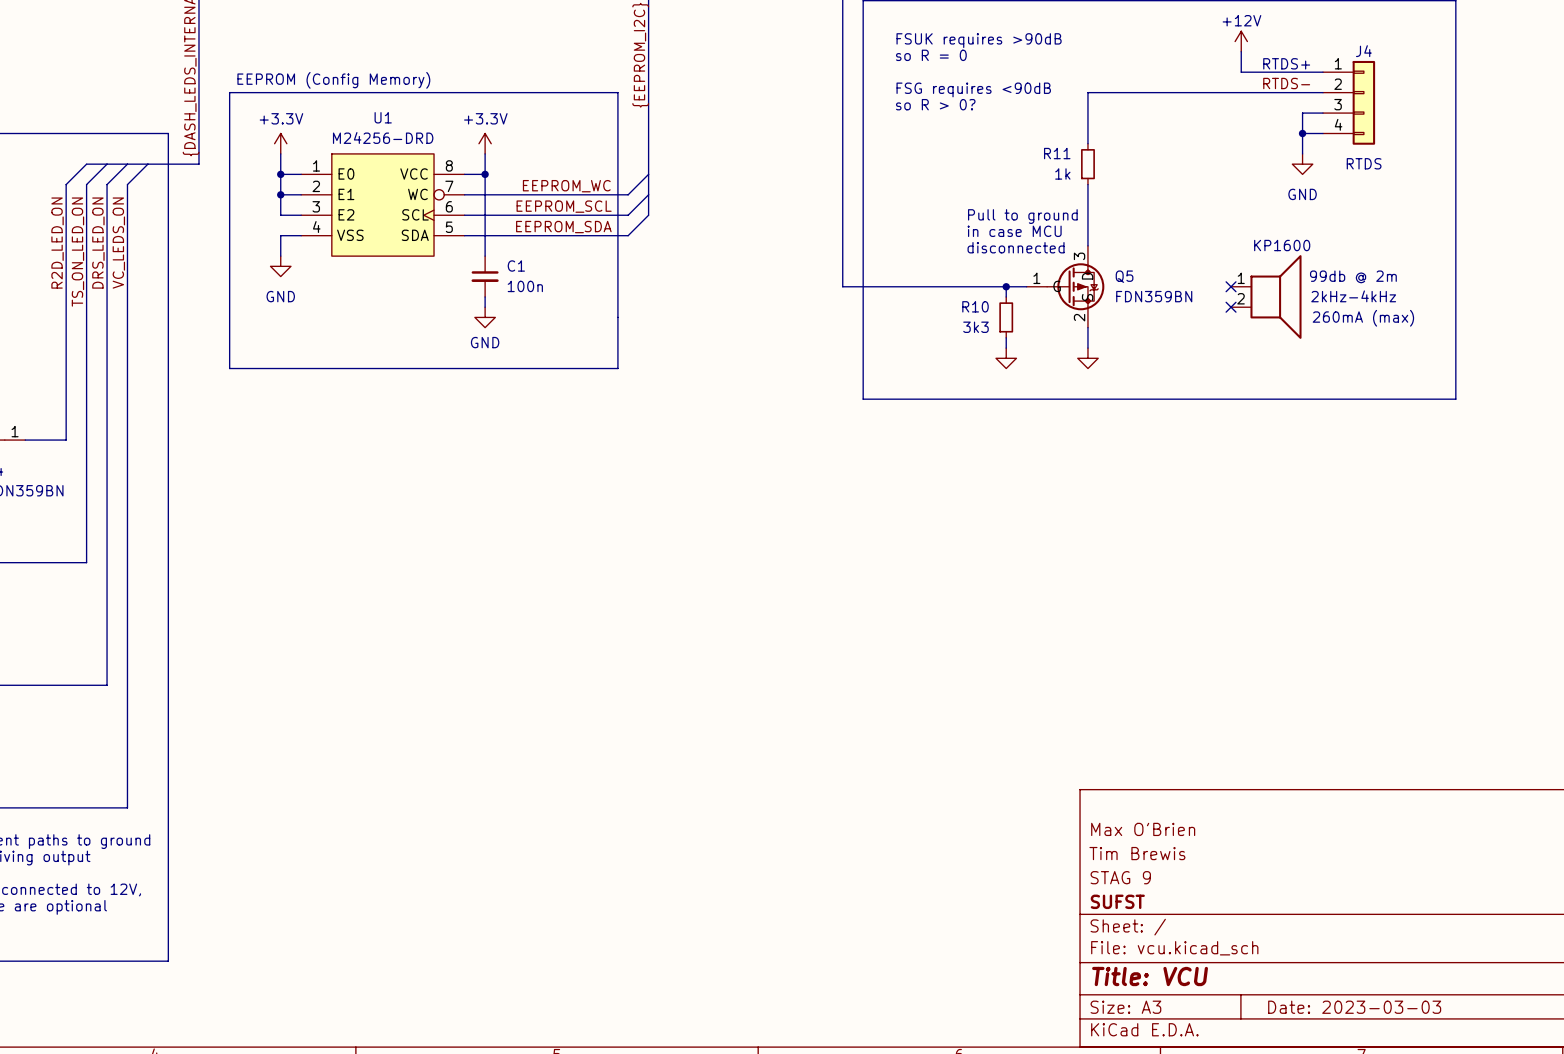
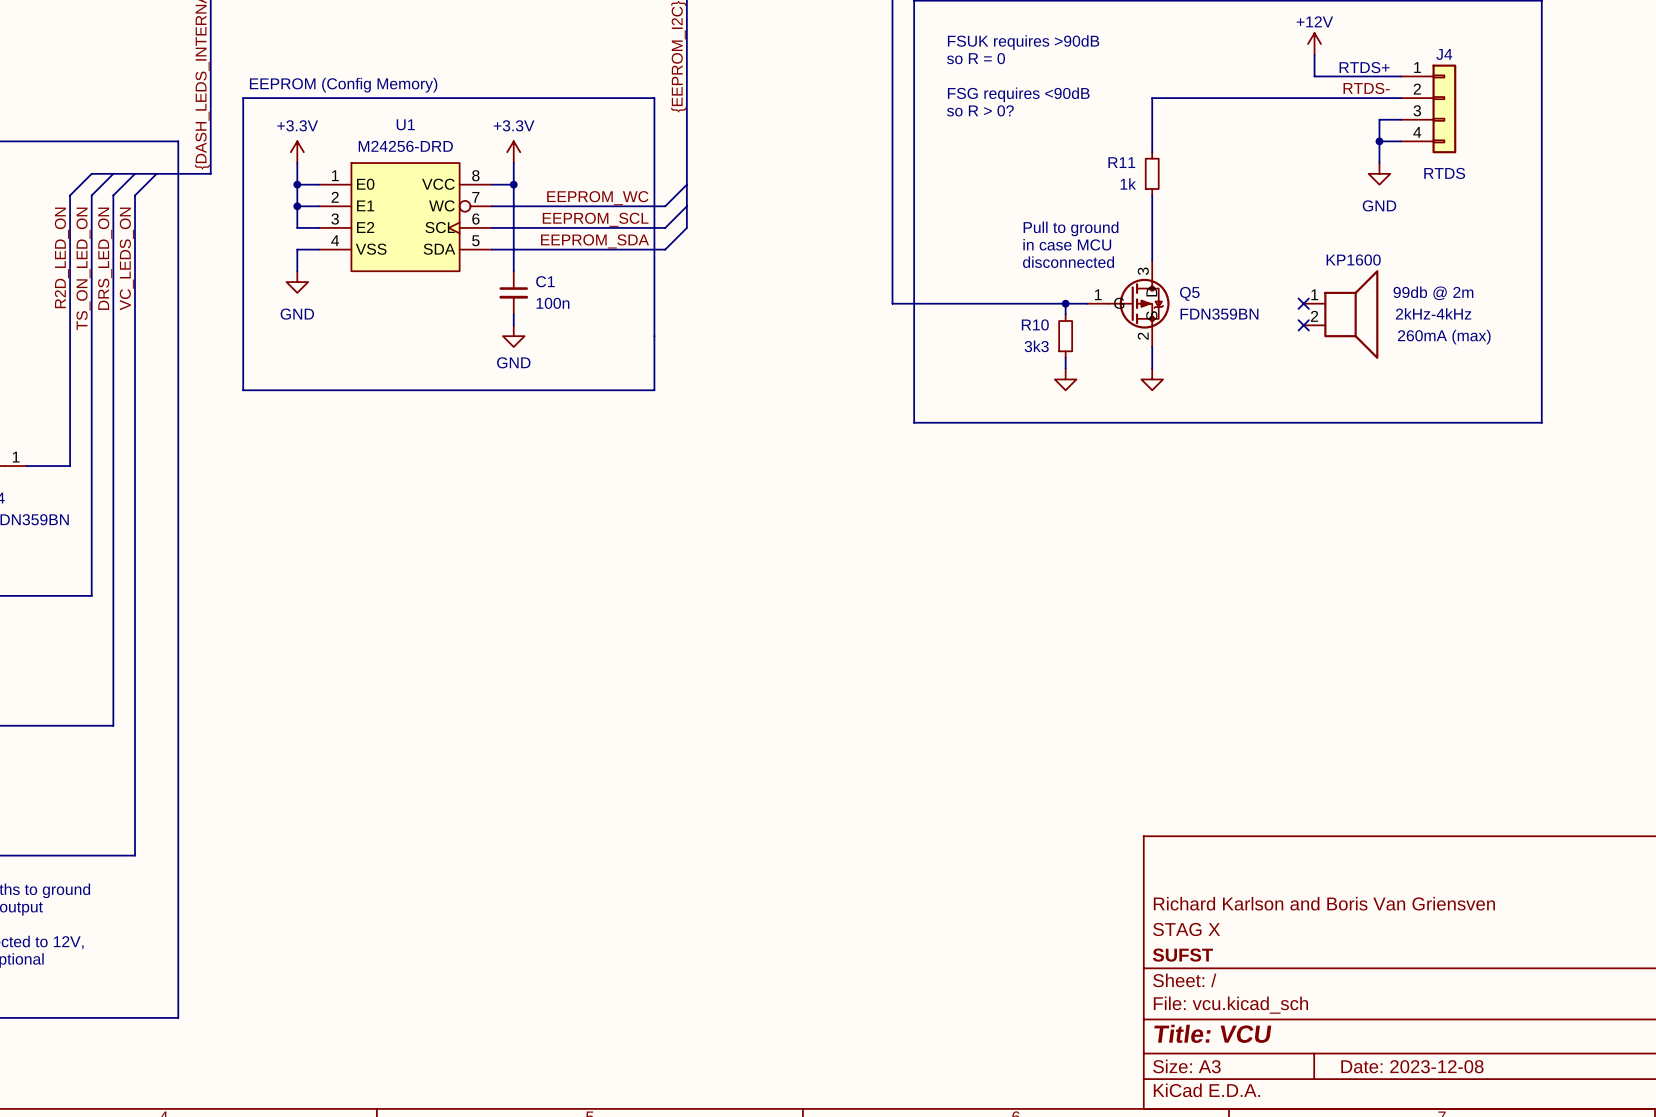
title block: Max O'Brien (1143, 829) -> none
title block: Tim Brewis (1137, 853) -> Richard Karlson and Boris Van Griensven (1324, 903)
title block: STAG 9 (1120, 877) -> STAG X (1186, 929)
title block: Date: 2023-03-03 (1354, 1007) -> Date: 2023-12-08 (1412, 1066)

